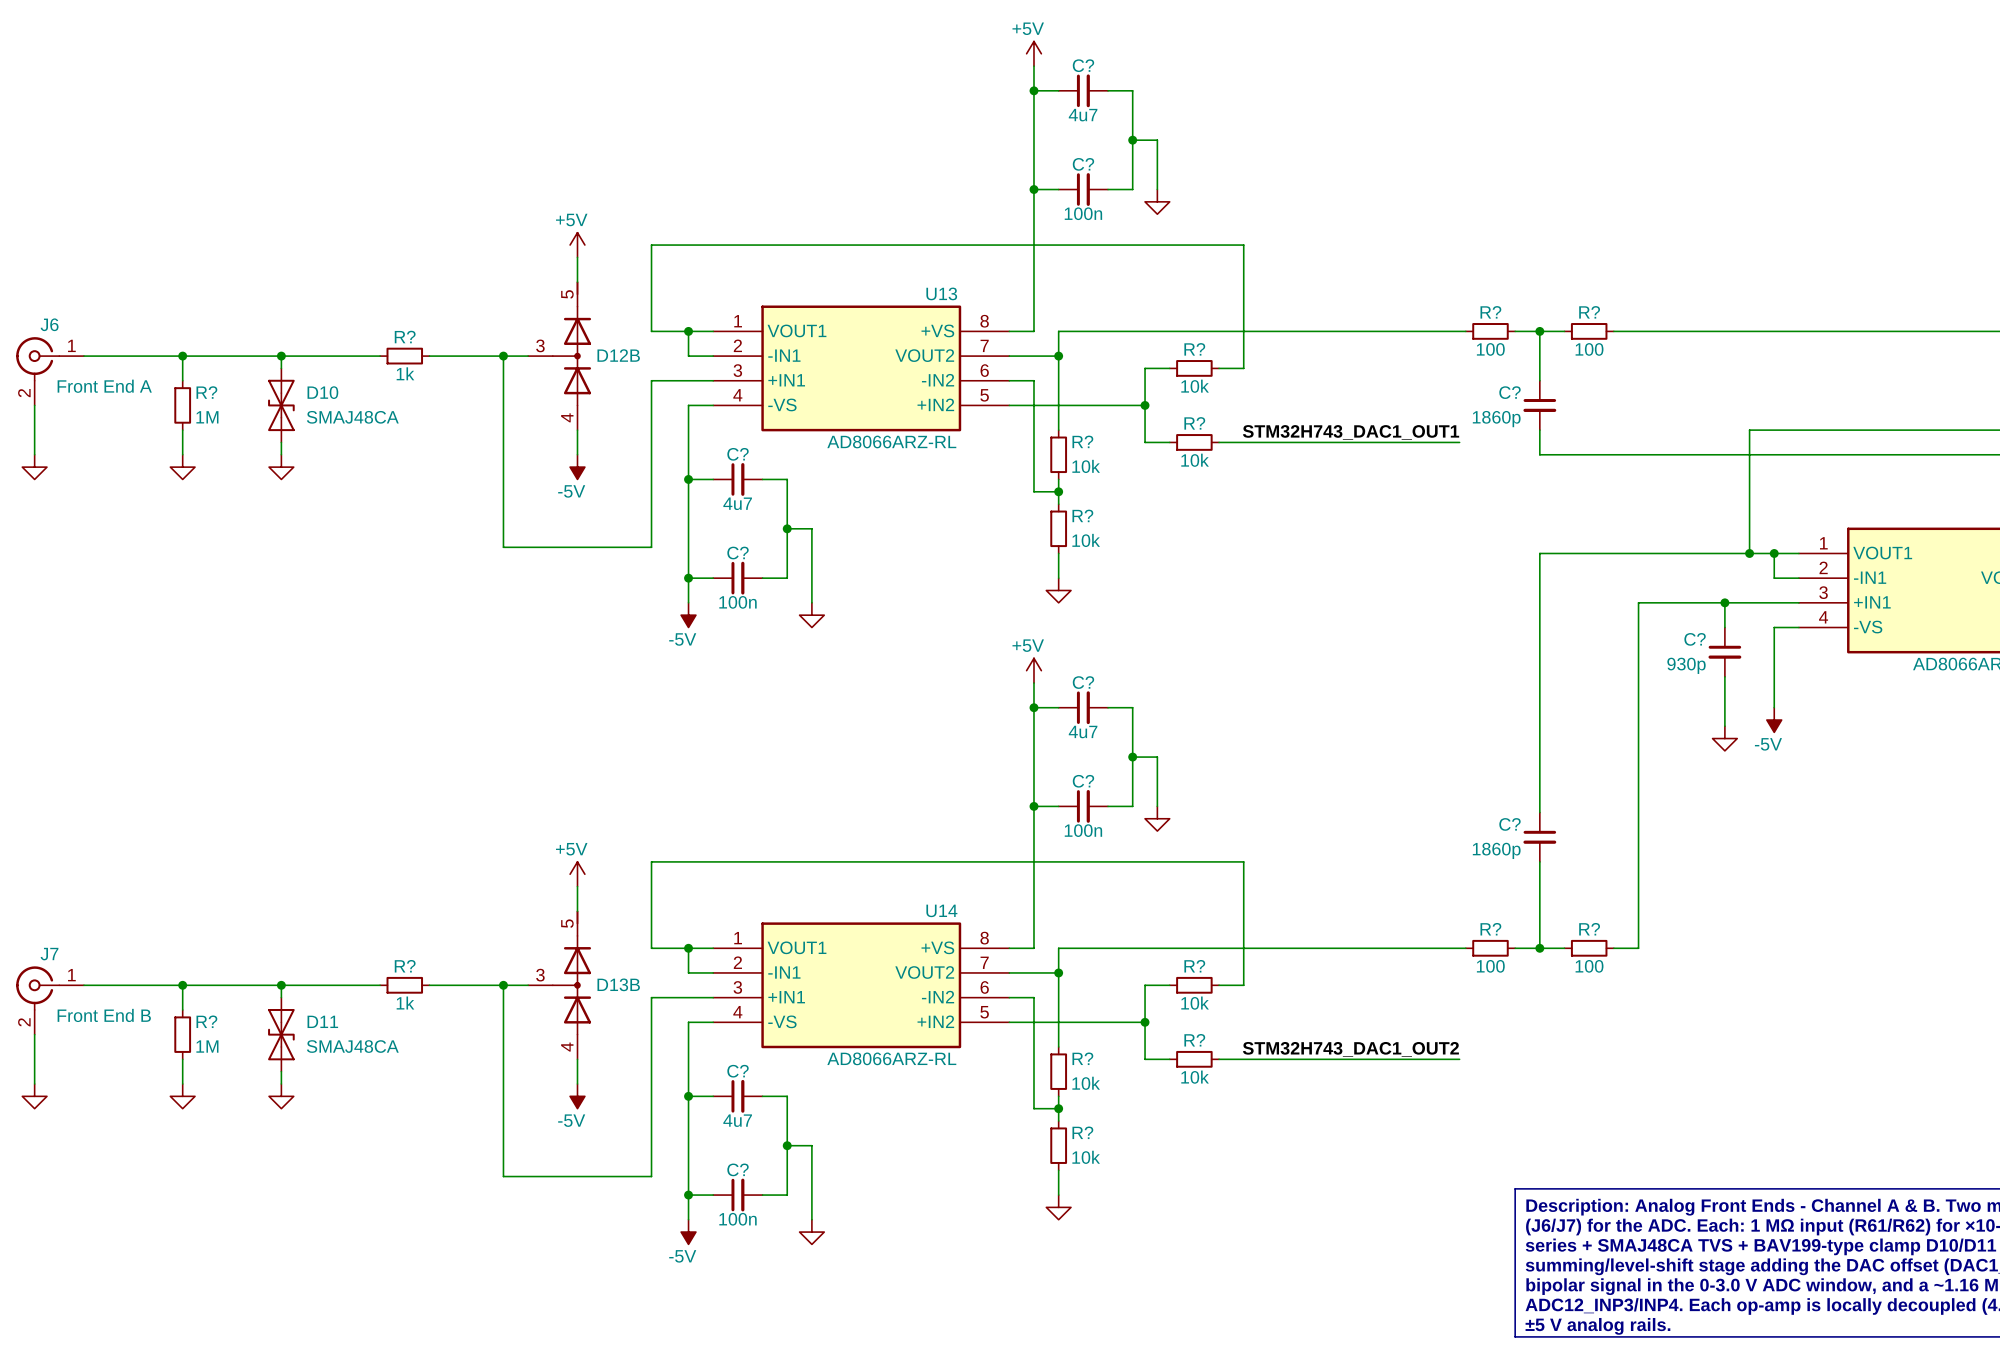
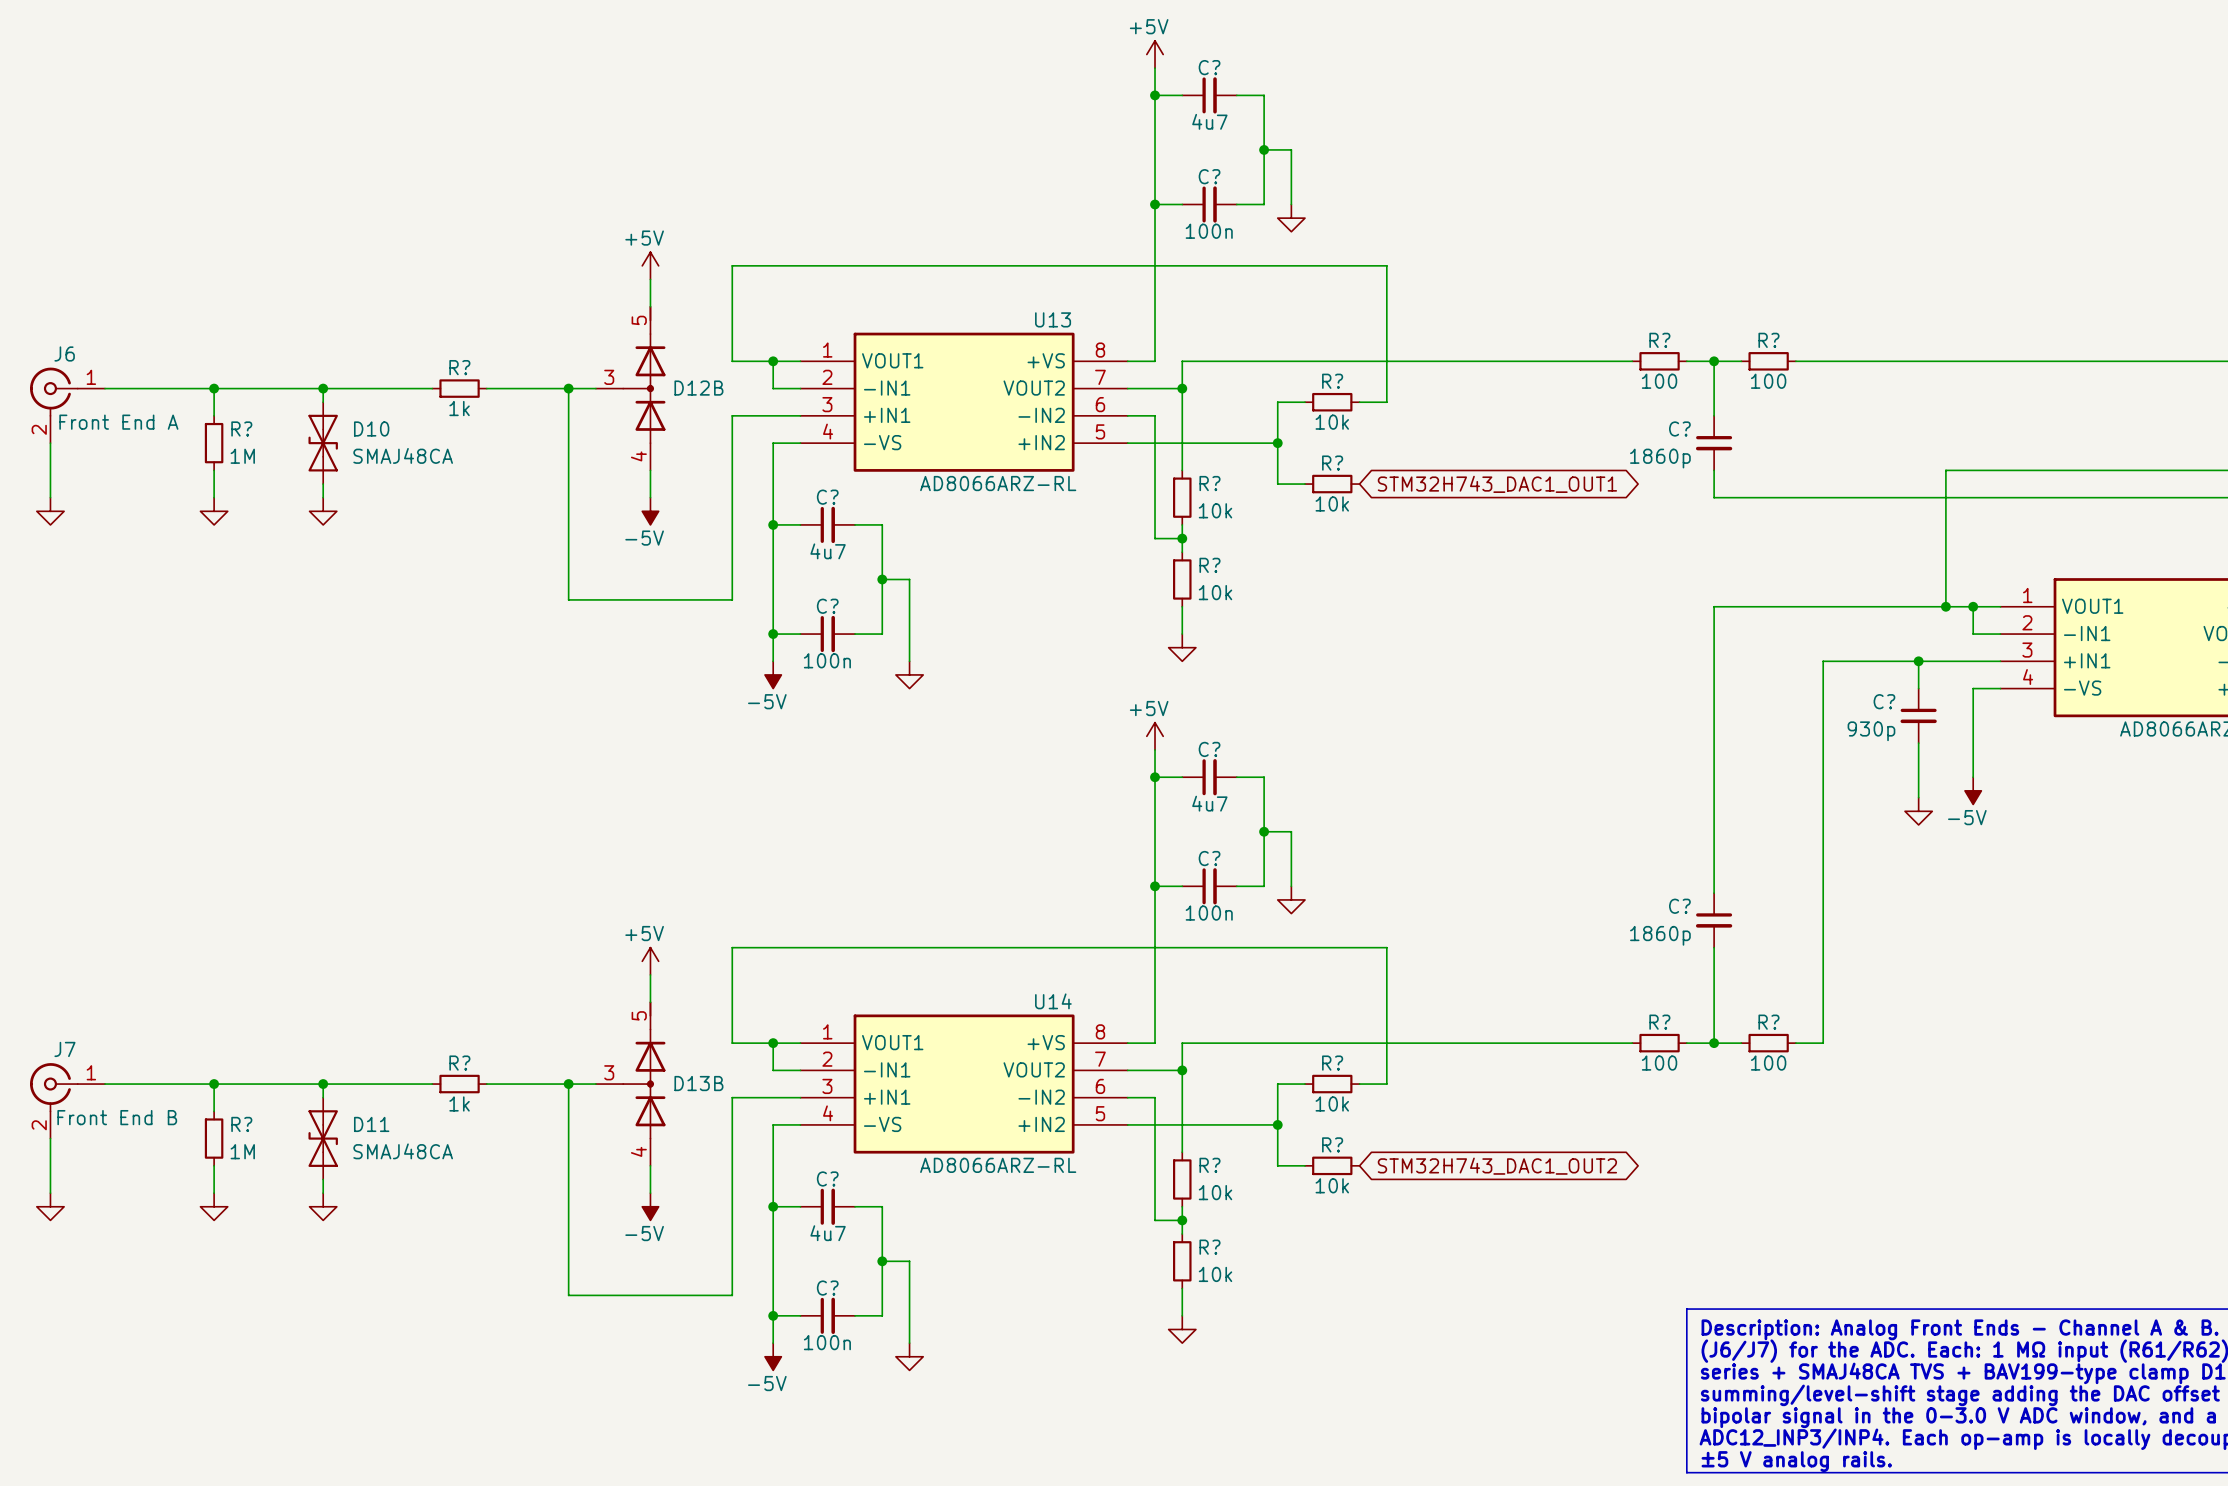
label: STM32H743_DAC1_OUT1 (1351, 432) -> none
wire: (1219, 442) (1459, 442) -> none
global label: none -> STM32H743_DAC1_OUT1 (1497, 484)
label: STM32H743_DAC1_OUT2 (1350, 1049) -> none
wire: (1219, 1059) (1459, 1059) -> none
global label: none -> STM32H743_DAC1_OUT2 (1497, 1166)

